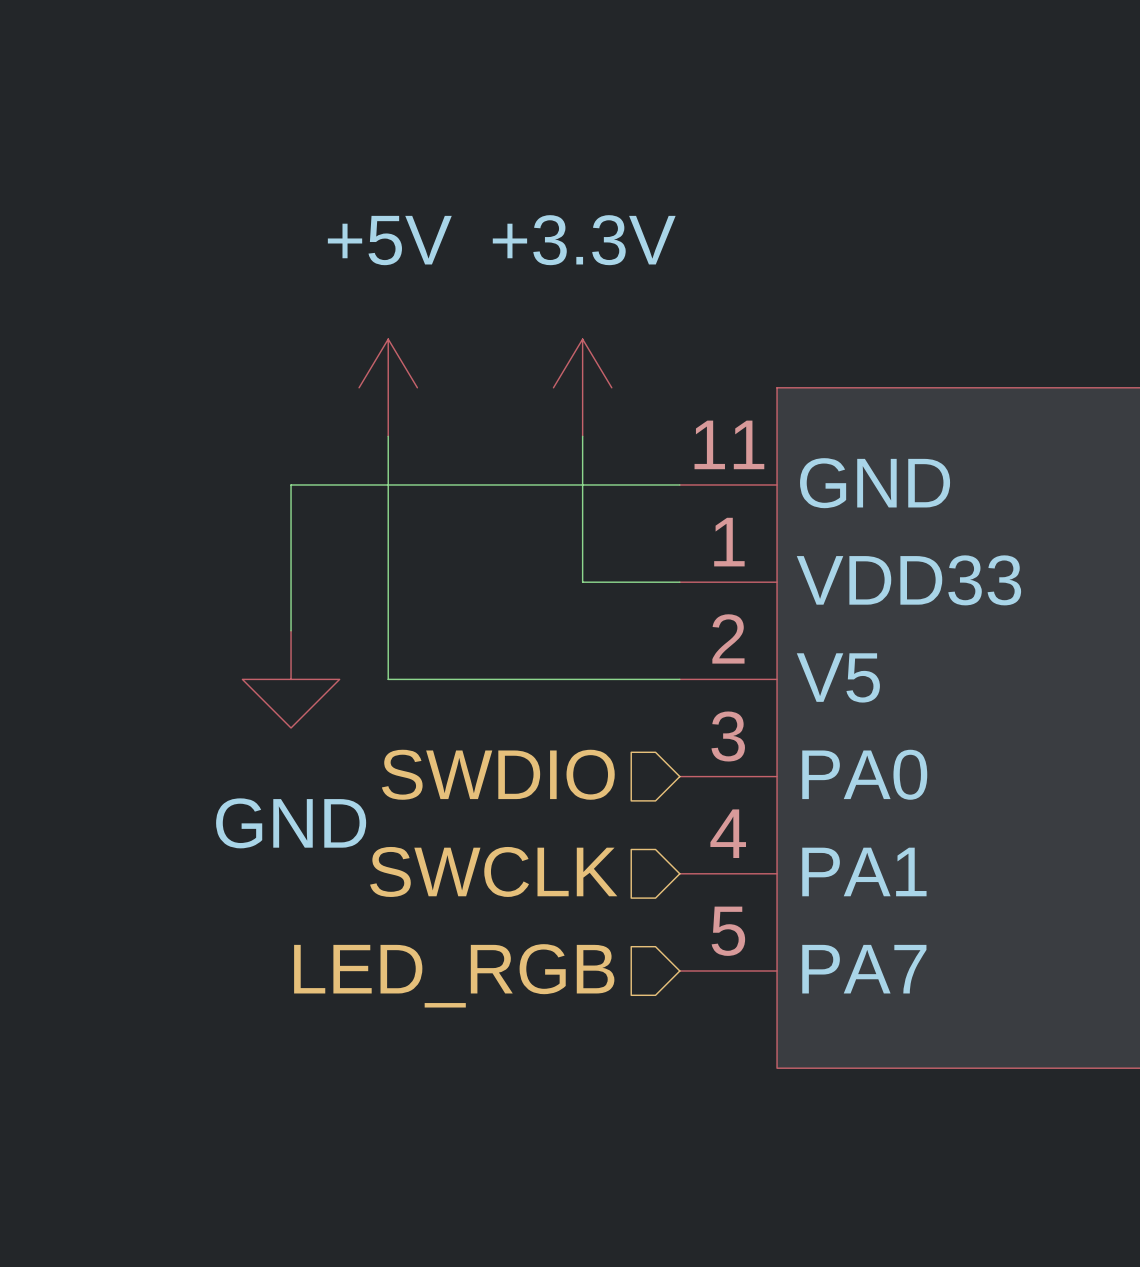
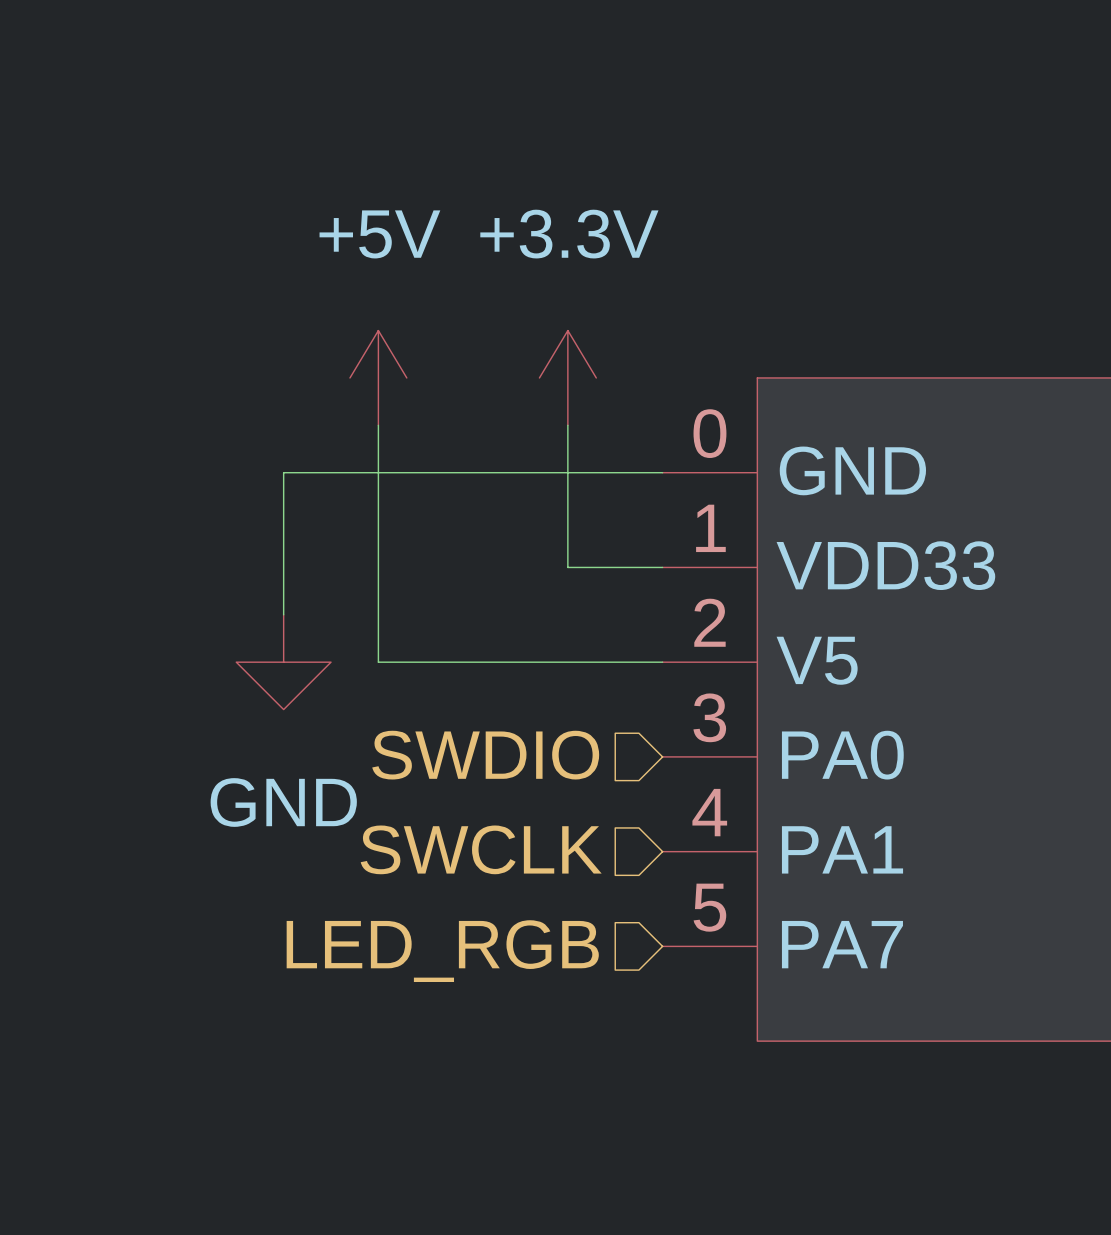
part pin number: 11 (729, 444) -> 0 (709, 433)

